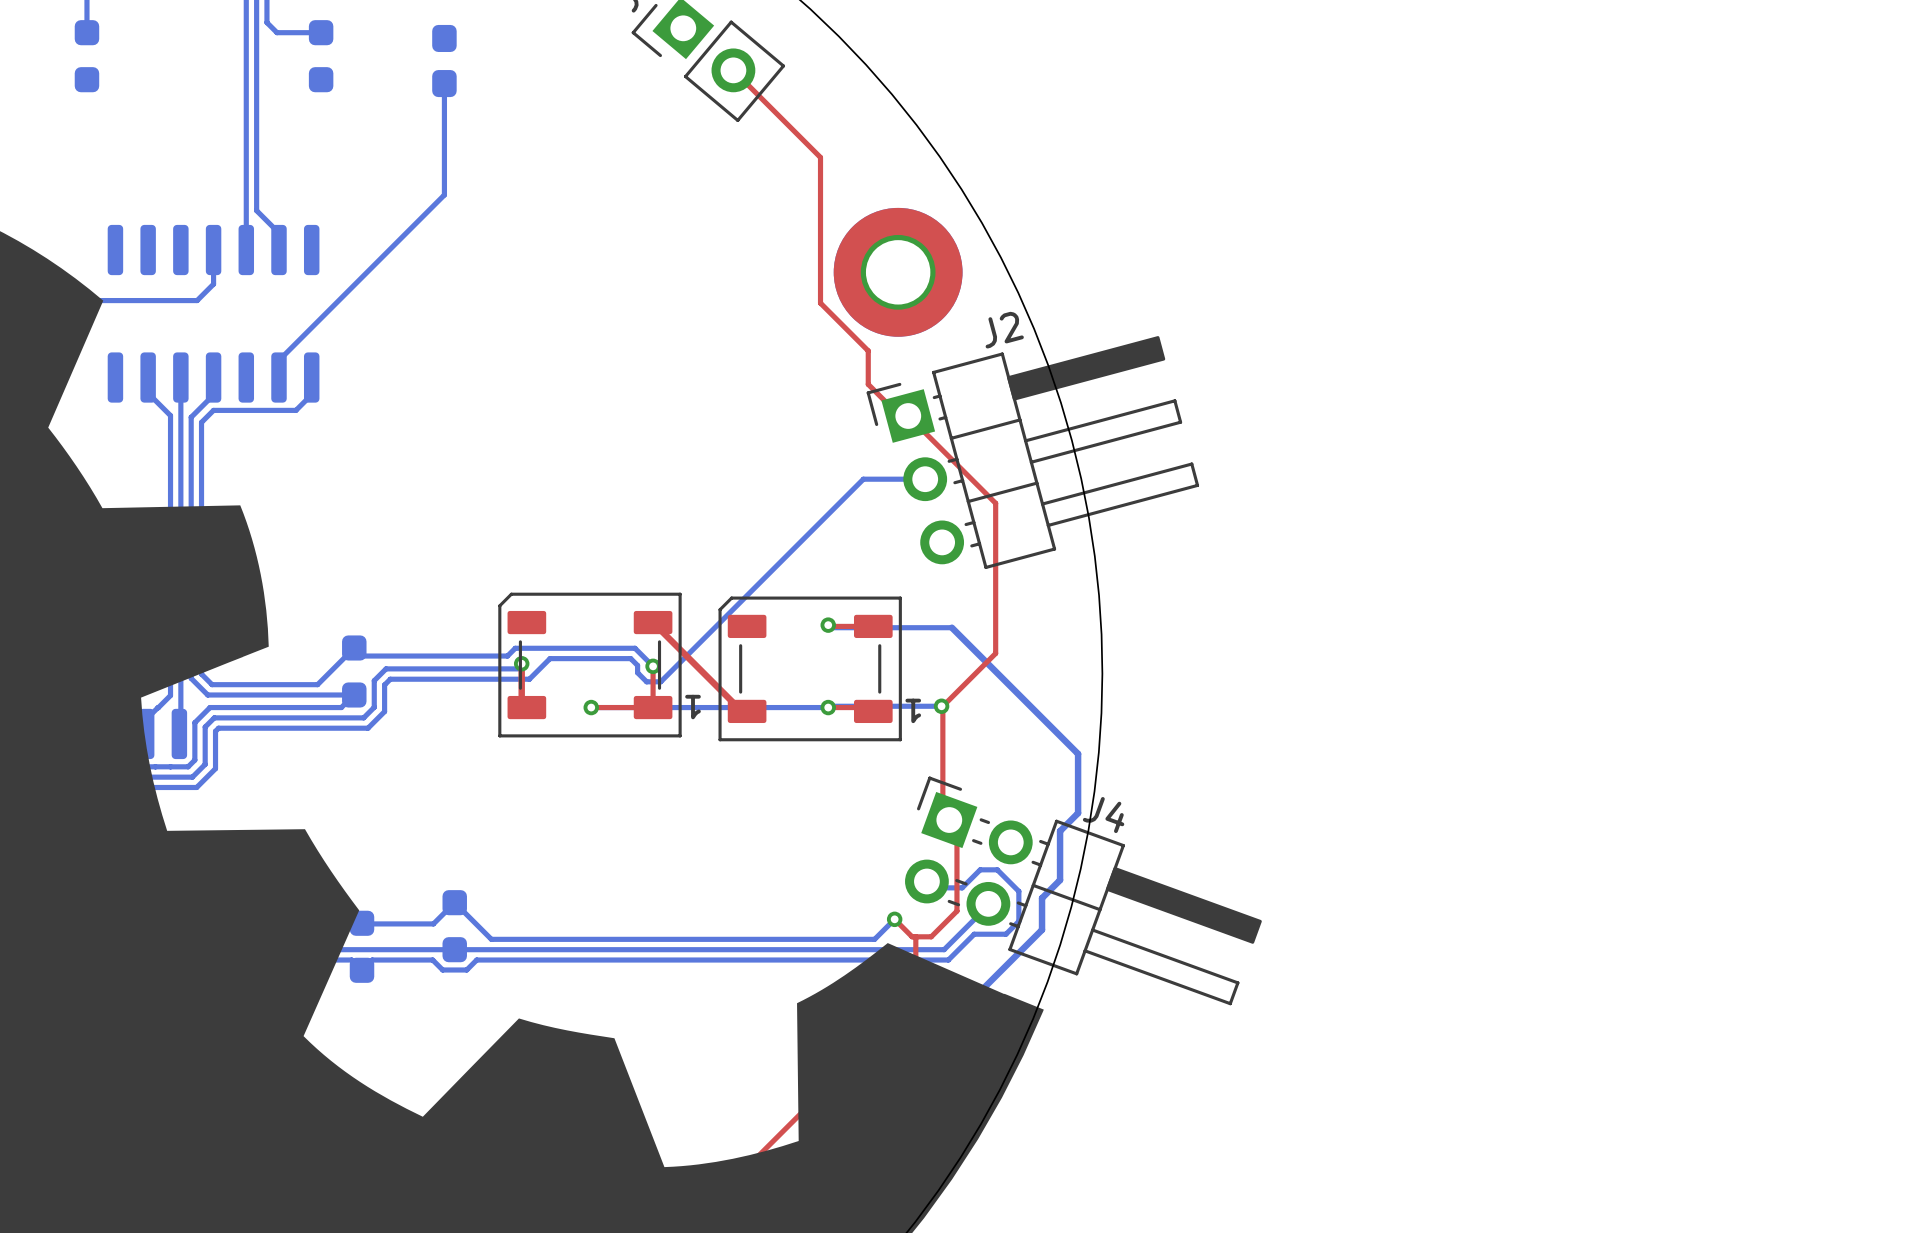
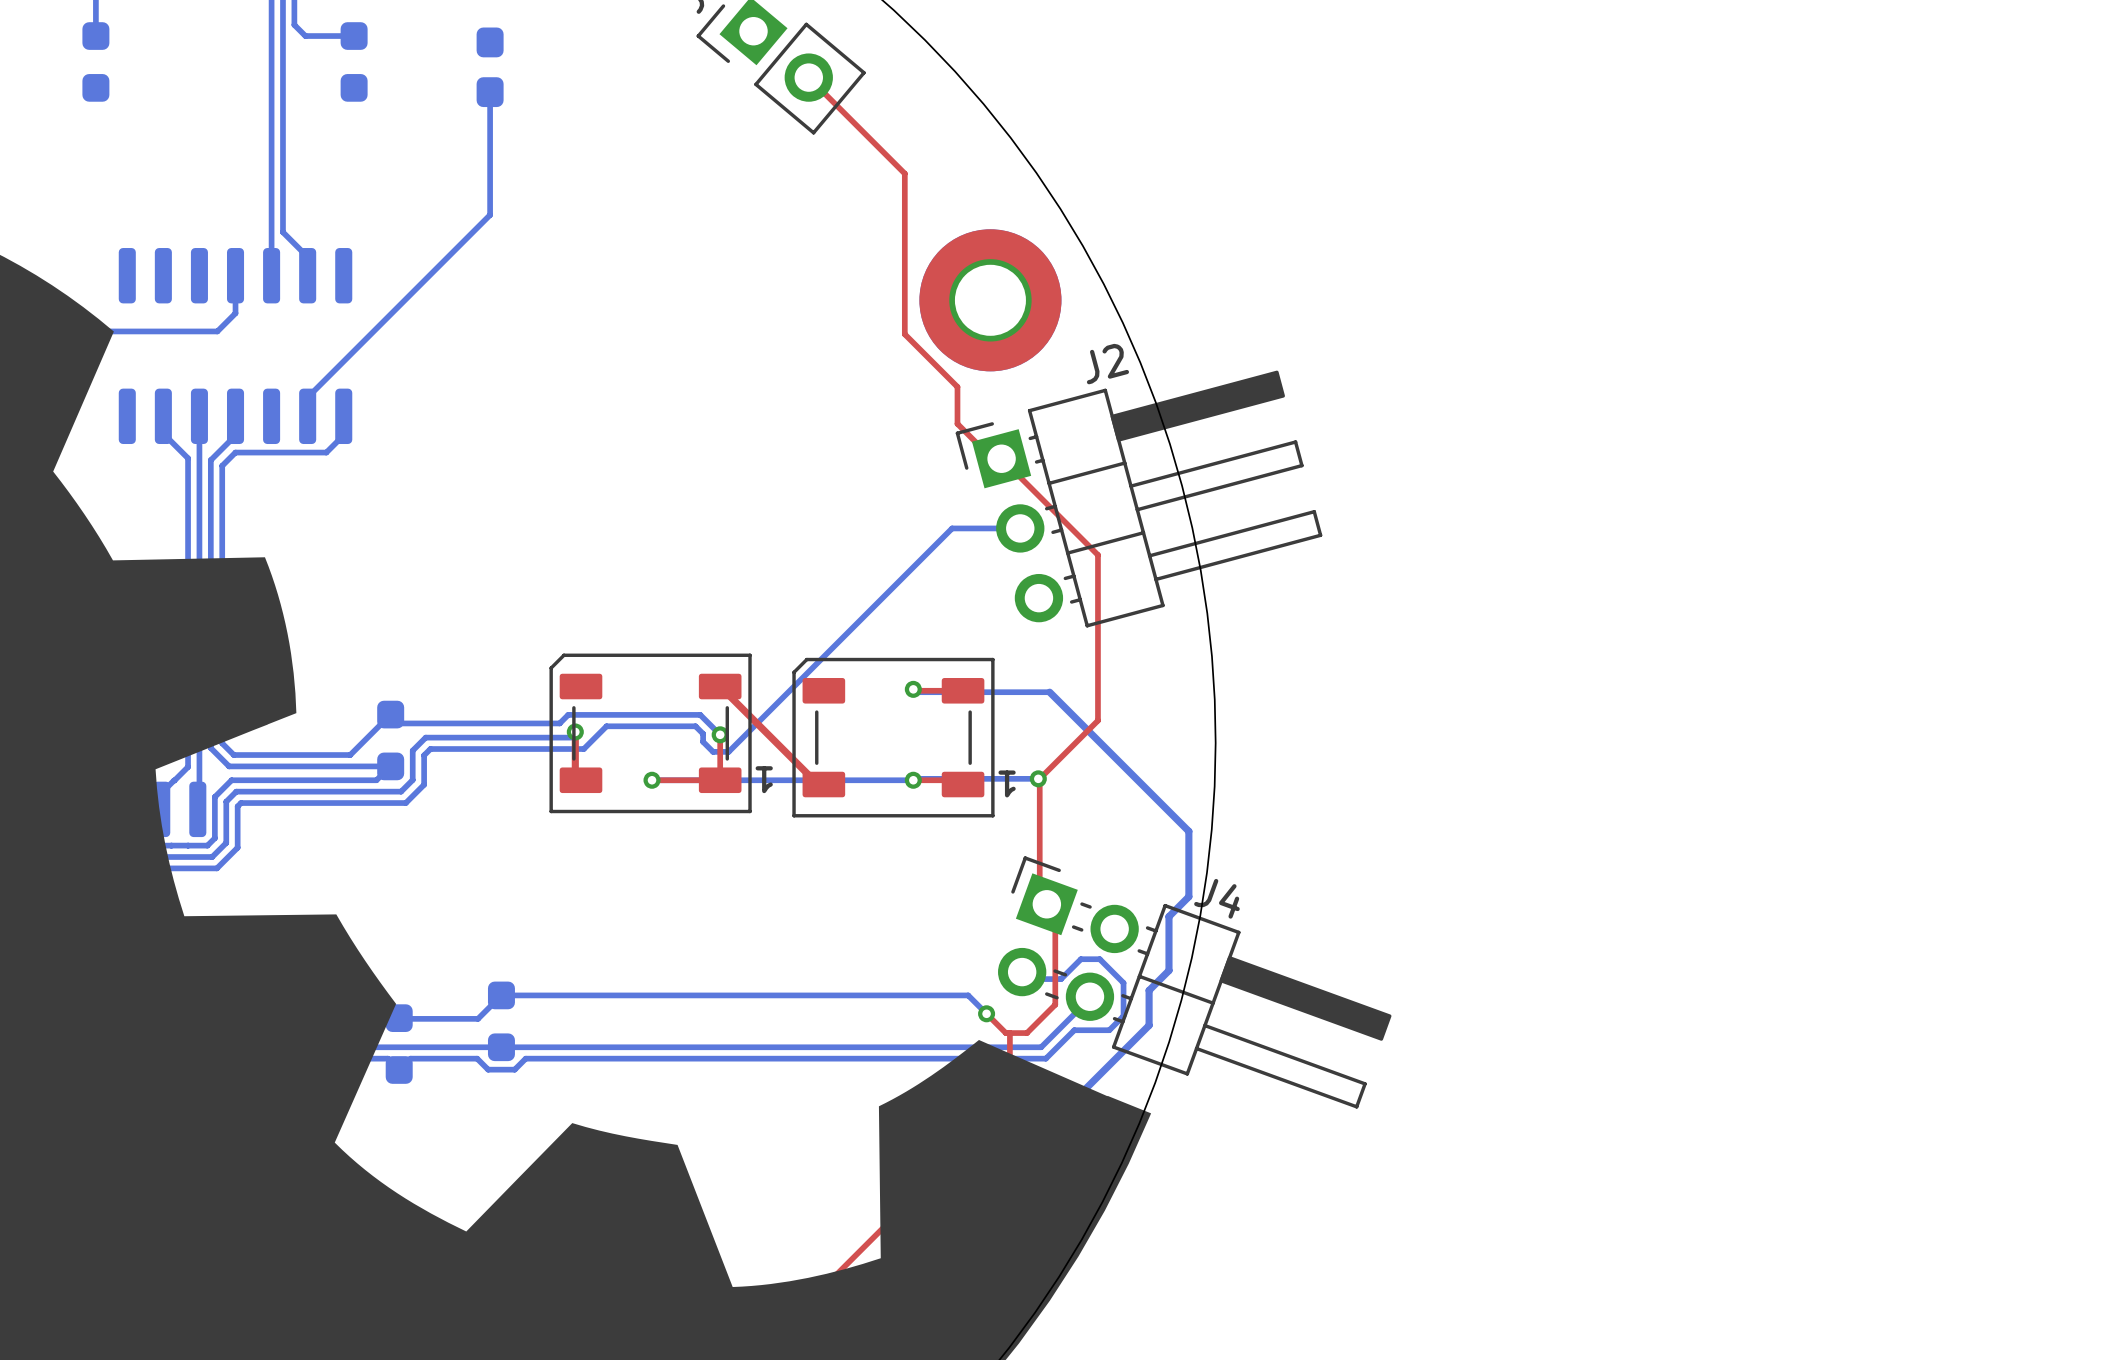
bottom track: (454, 902) (491, 939) (874, 939) (894, 919) -> (501, 995) (968, 995) (986, 1013)

